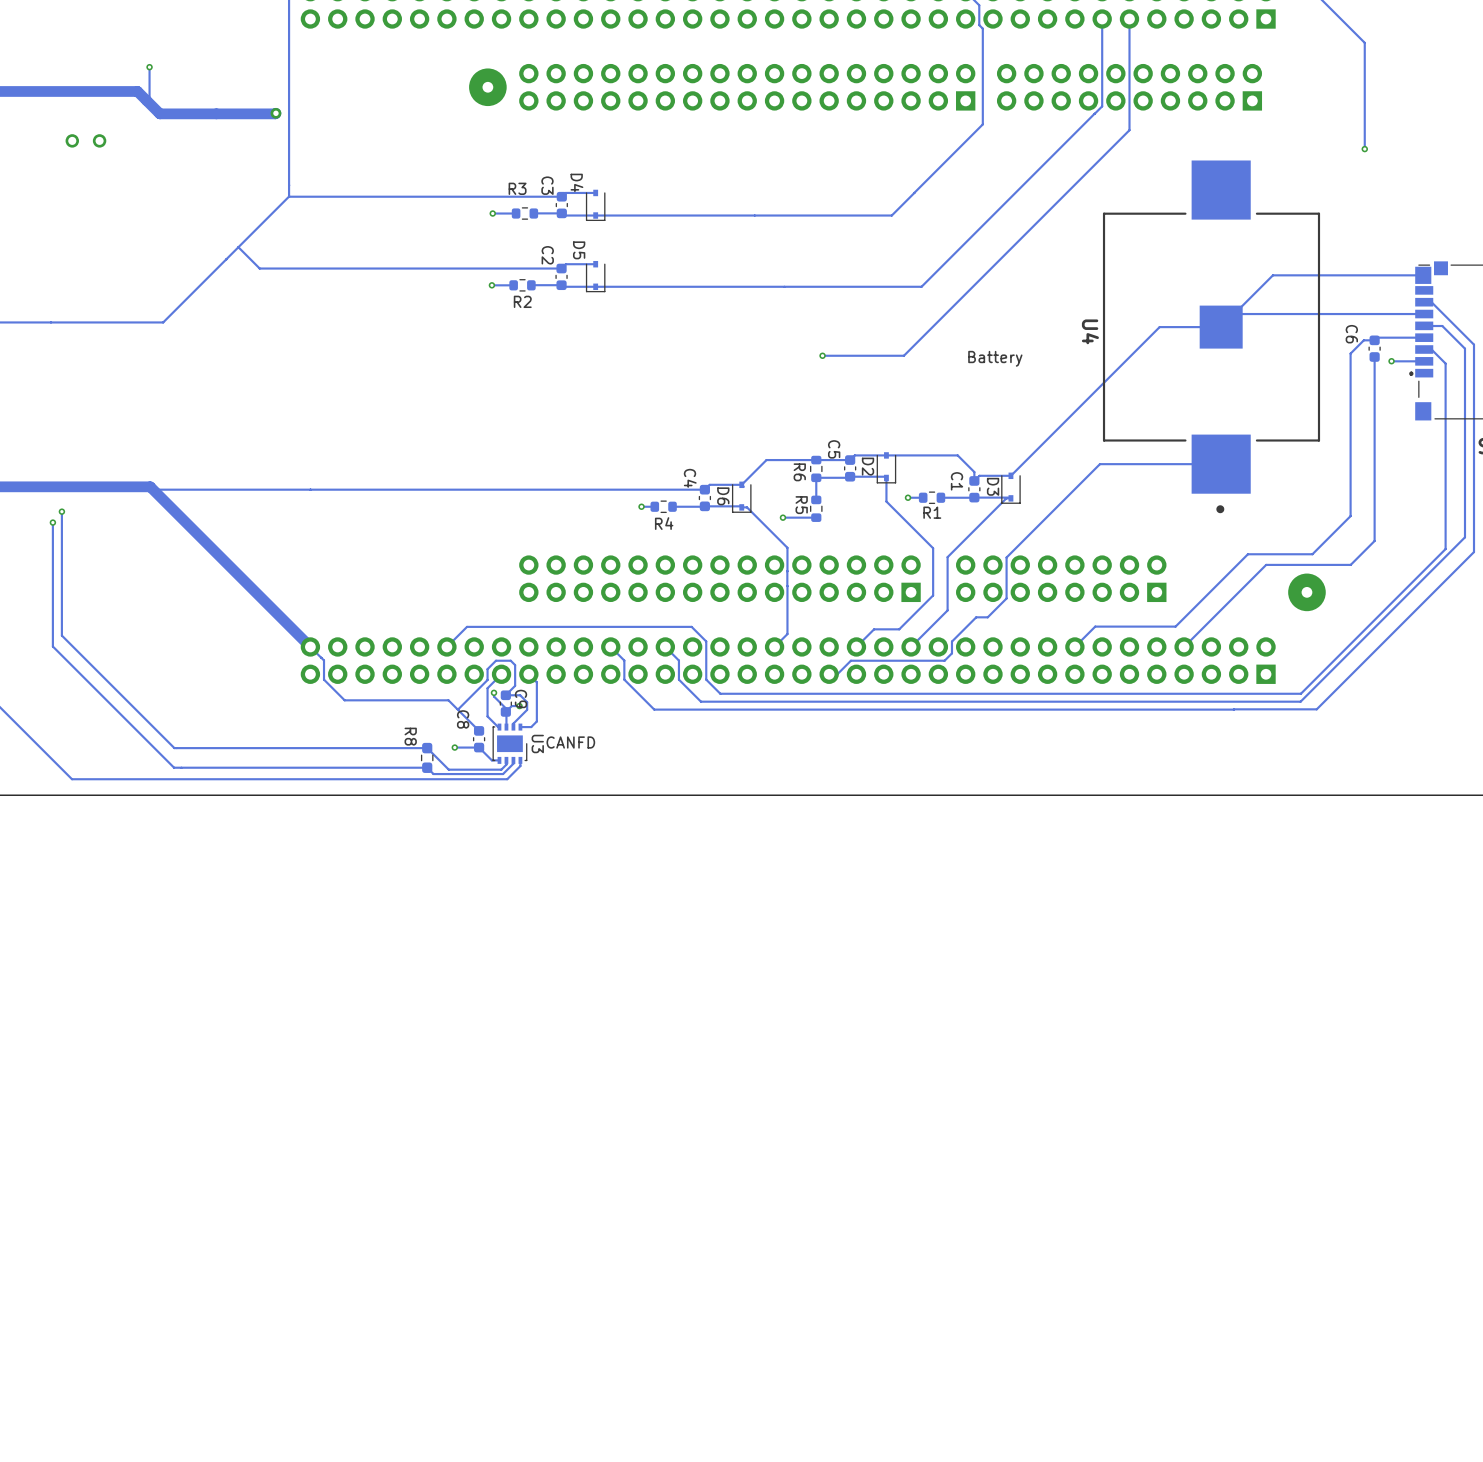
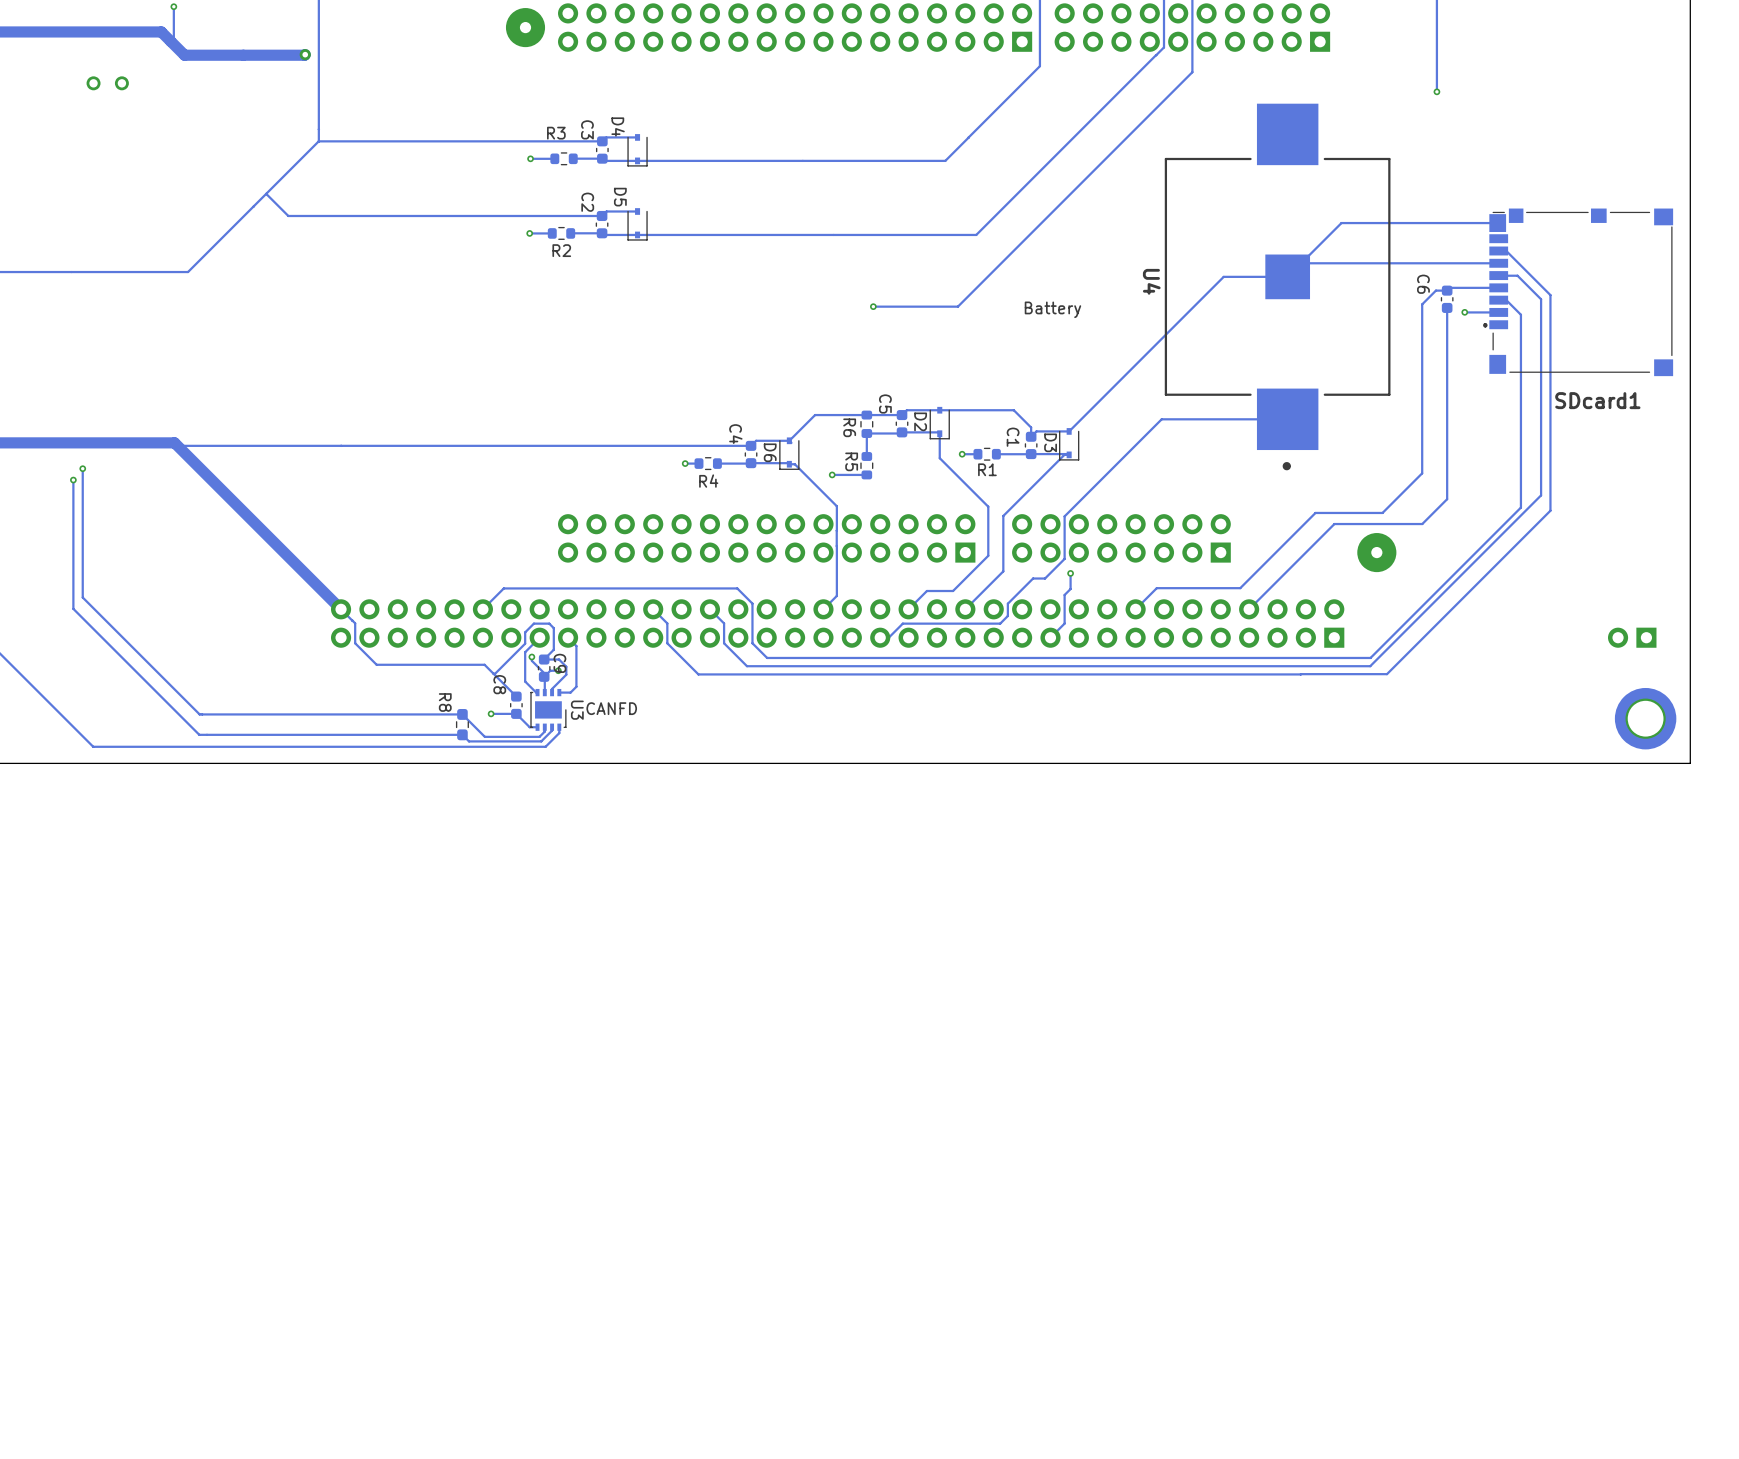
track: none -> (1070, 573) (1070, 589) (1064, 594) (1064, 623) (1050, 637)
via: none -> (1070, 573)

